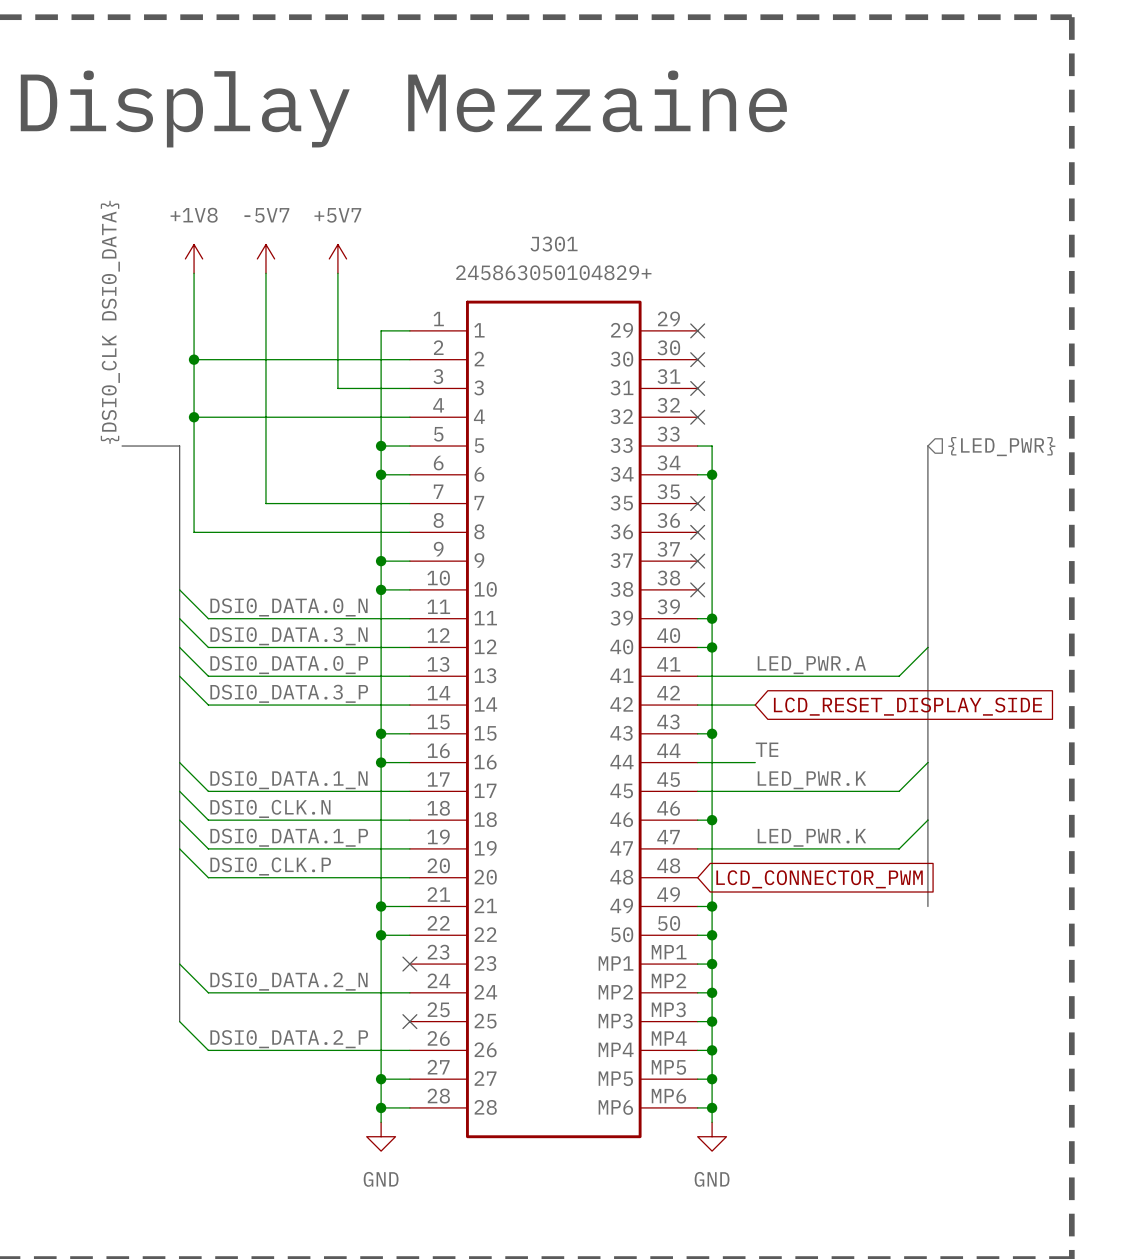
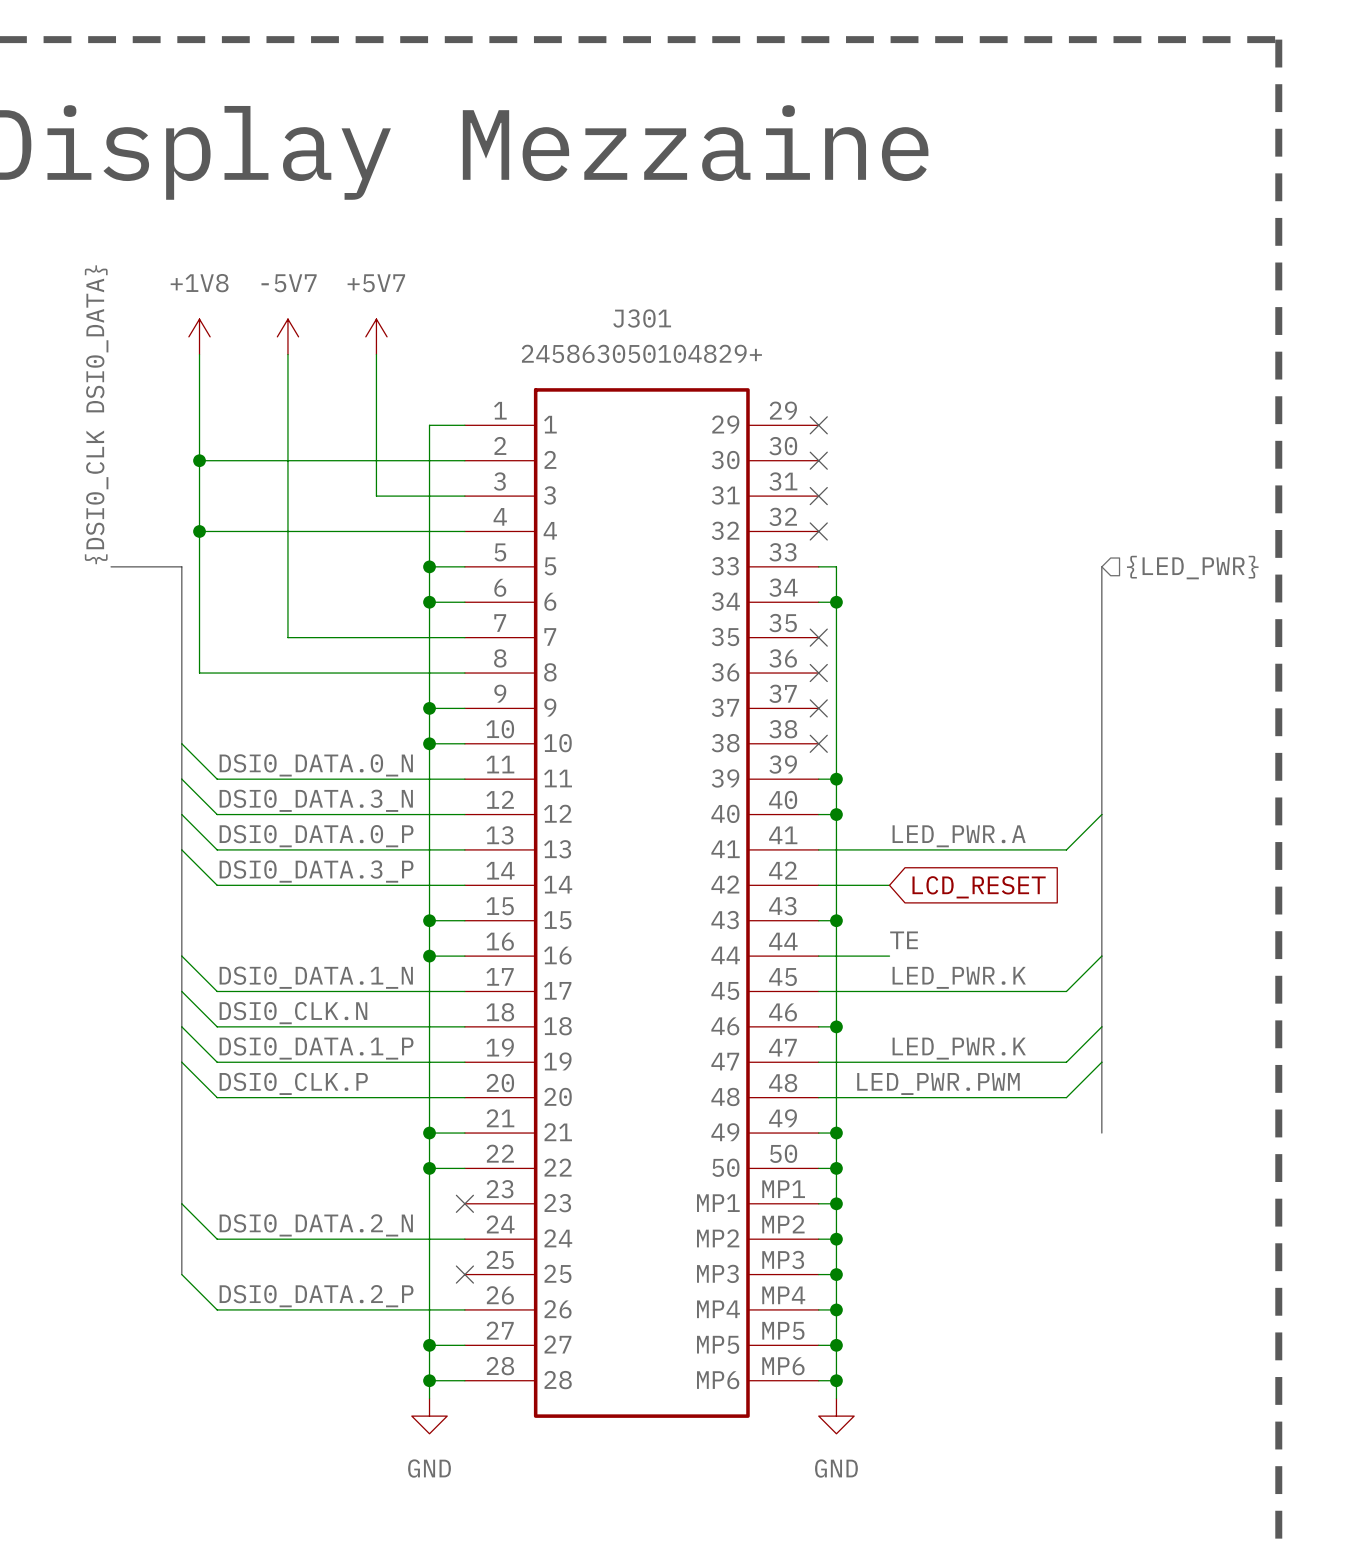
global label: LCD_RESET_DISPLAY_SIDE (907, 706) -> LCD_RESET (979, 887)
wire: none -> (1101, 1062) (1066, 1097) (818, 1097)
label: none -> LED_PWR.PWM (938, 1083)
global label: LCD_CONNECTOR_PWM (819, 879) -> none

